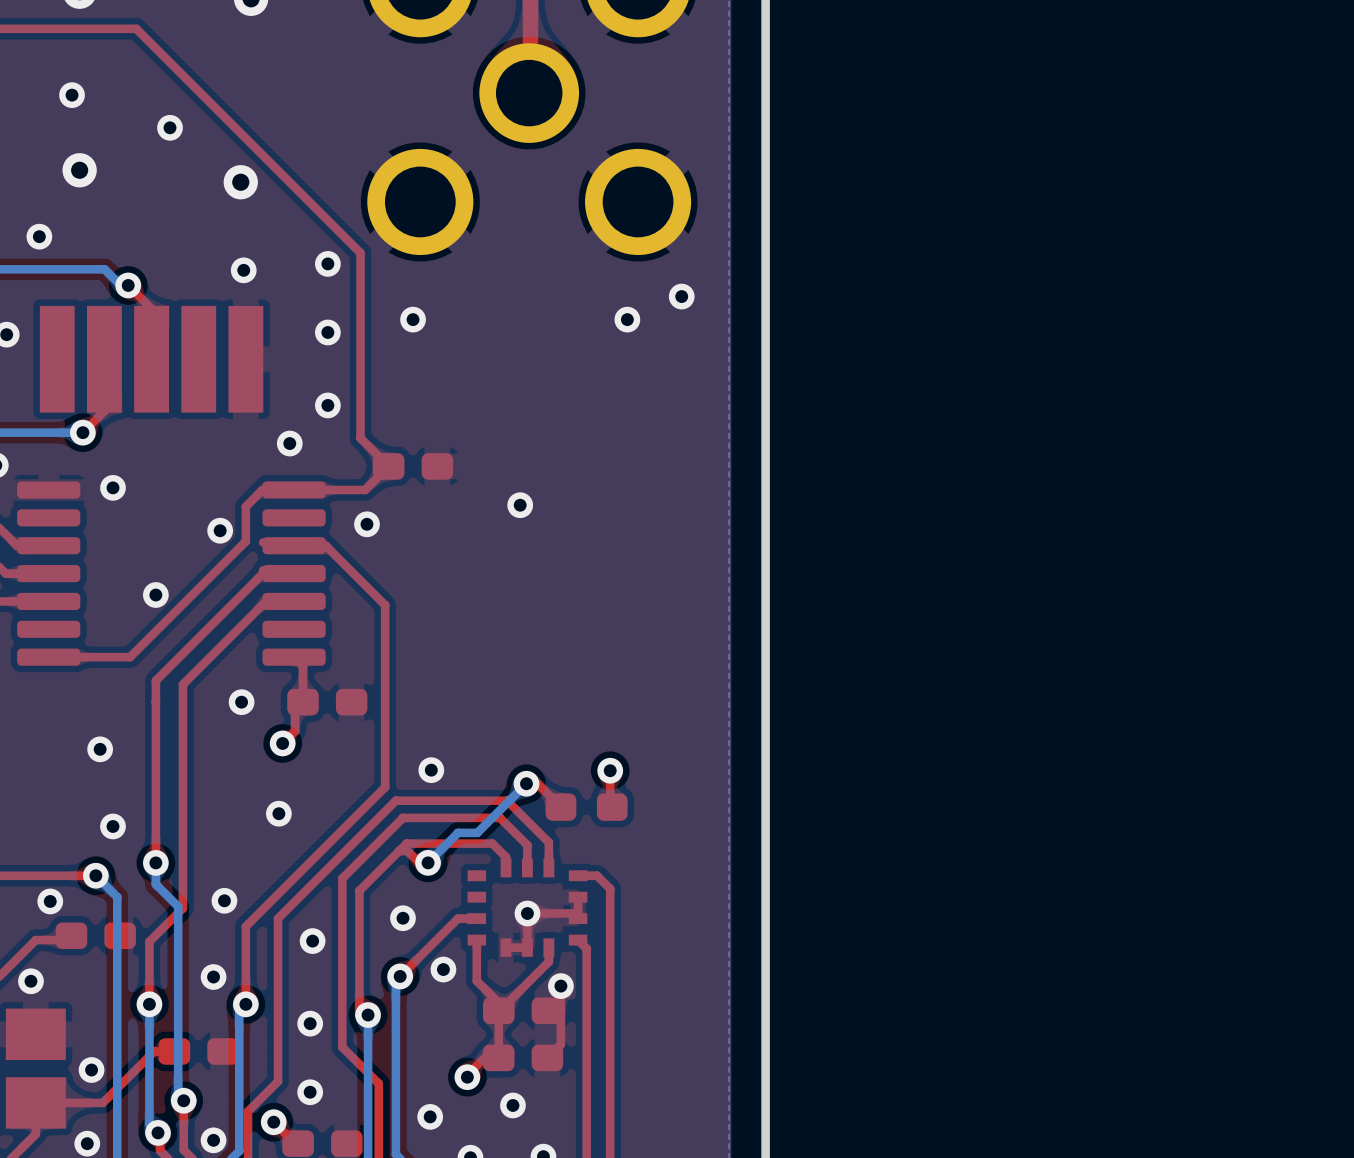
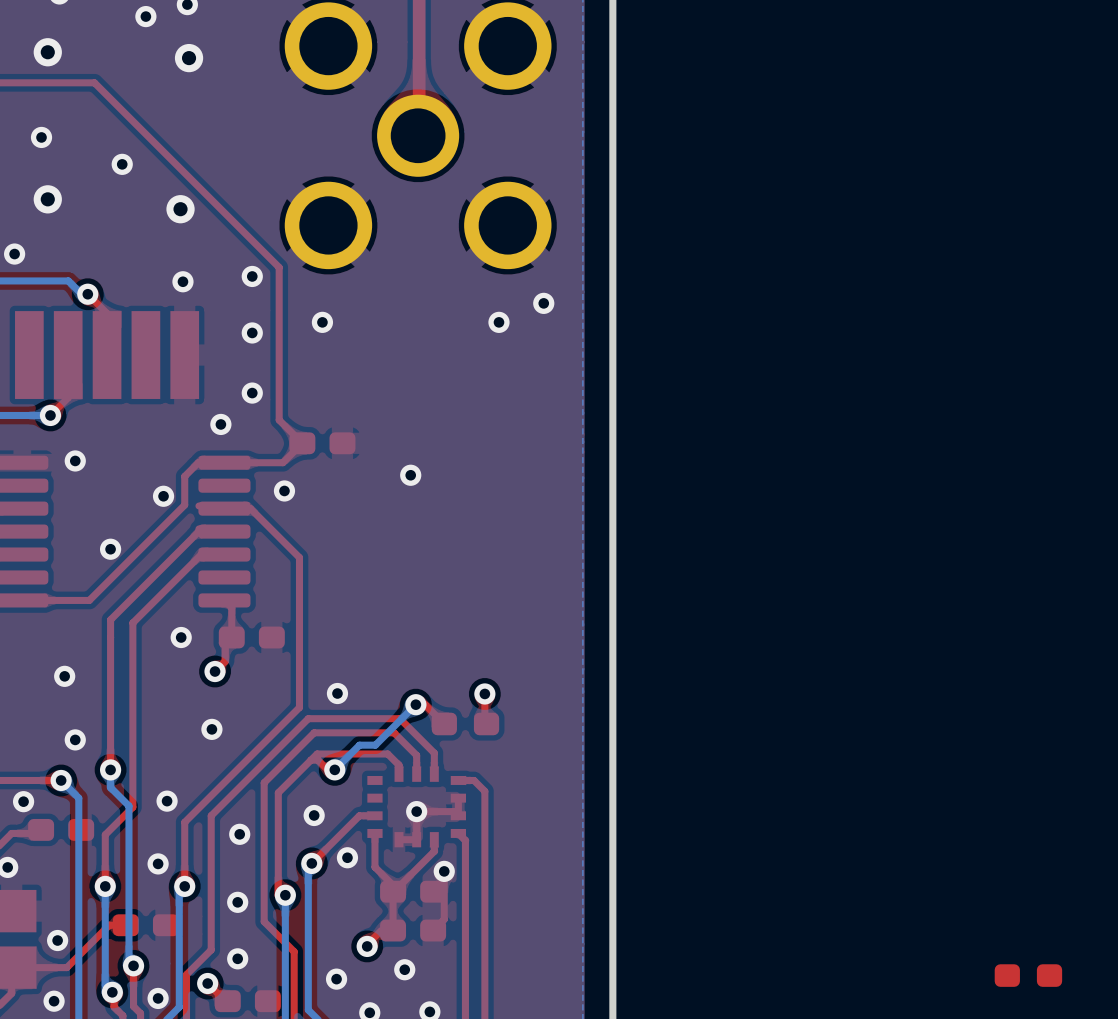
part: none -> (1028, 975)

